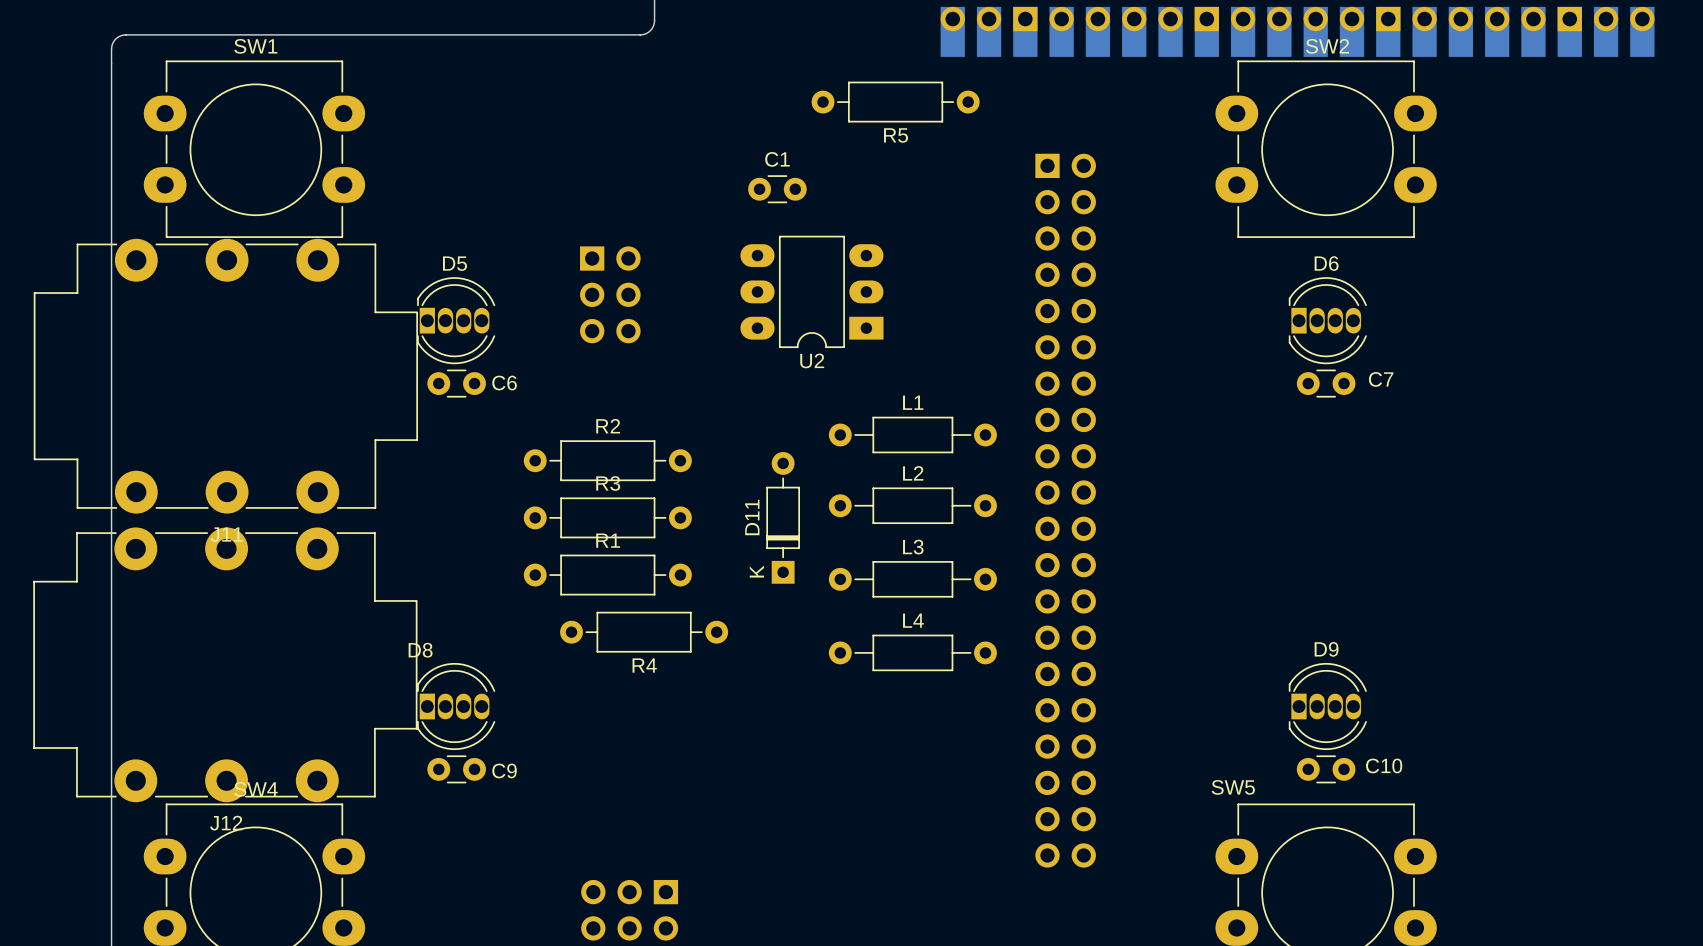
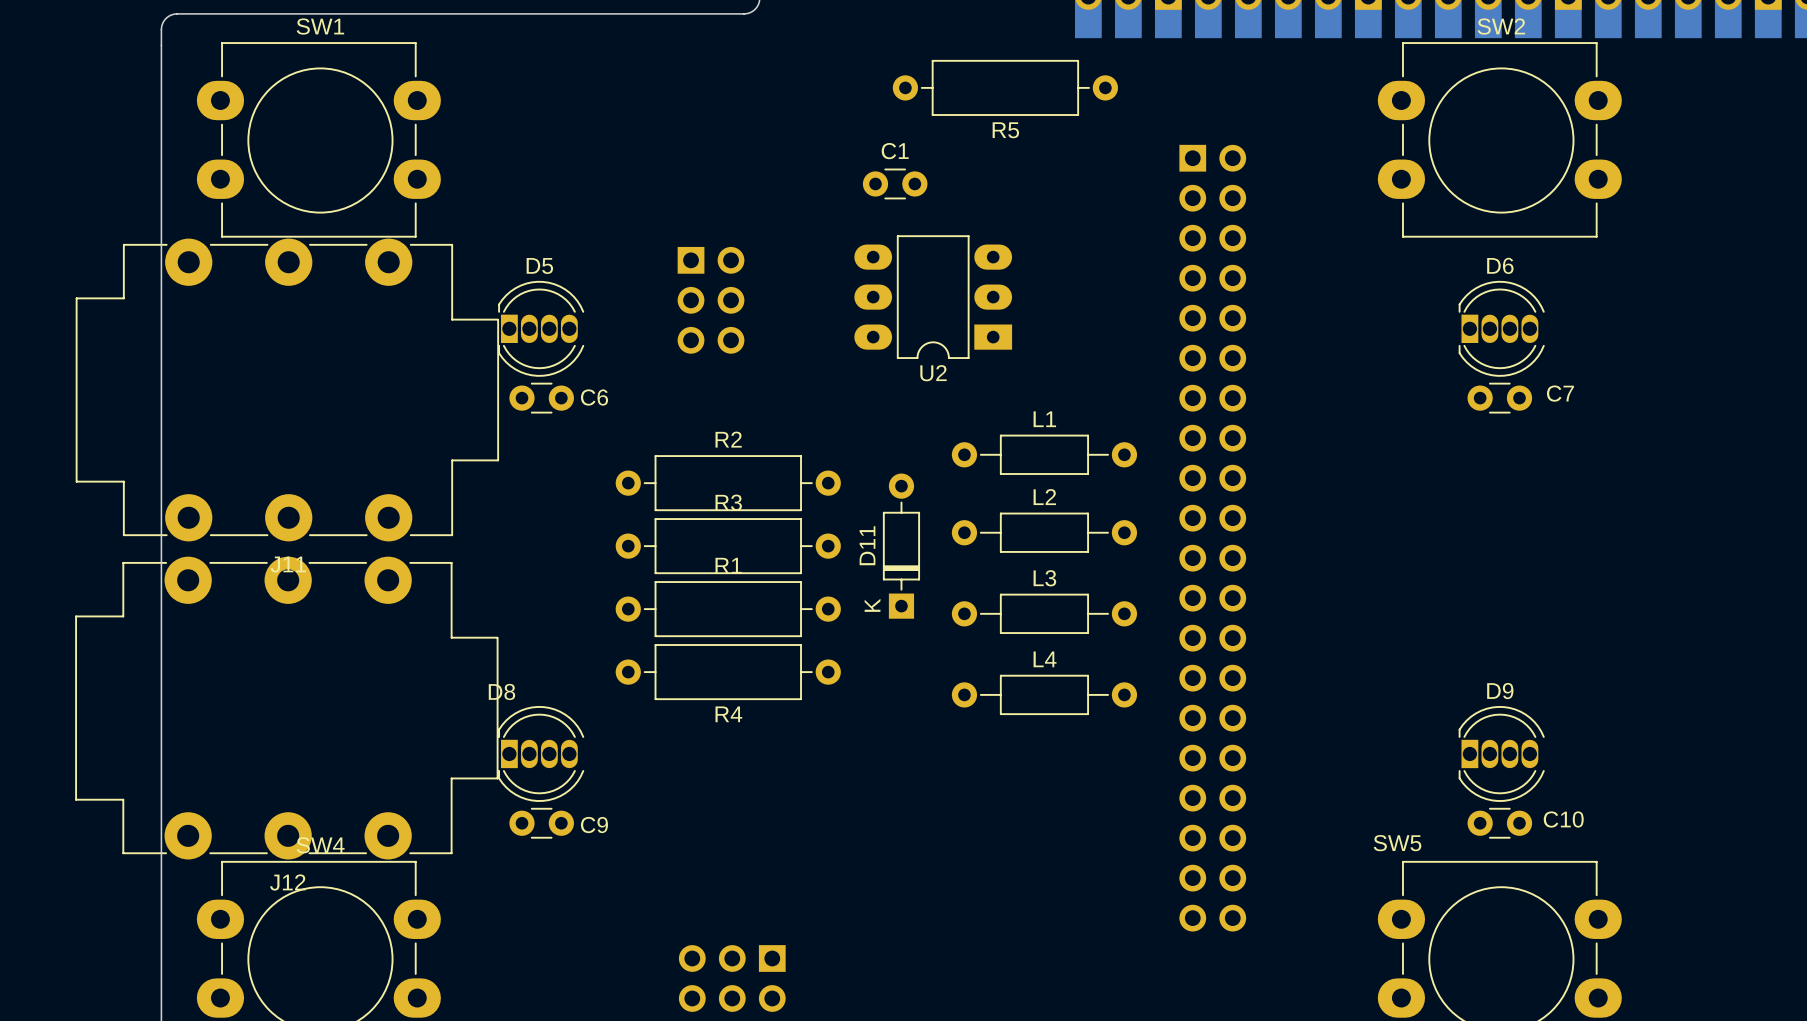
R5 footprint: [811, 81, 980, 123] -> [892, 59, 1118, 116]
R2 footprint: [523, 440, 692, 482] -> [615, 455, 841, 512]
R3 footprint: [523, 497, 692, 539] -> [615, 518, 841, 575]
R1 footprint: [523, 554, 692, 596] -> [615, 581, 841, 638]
R4 footprint: [560, 611, 729, 653] -> [615, 644, 841, 701]

